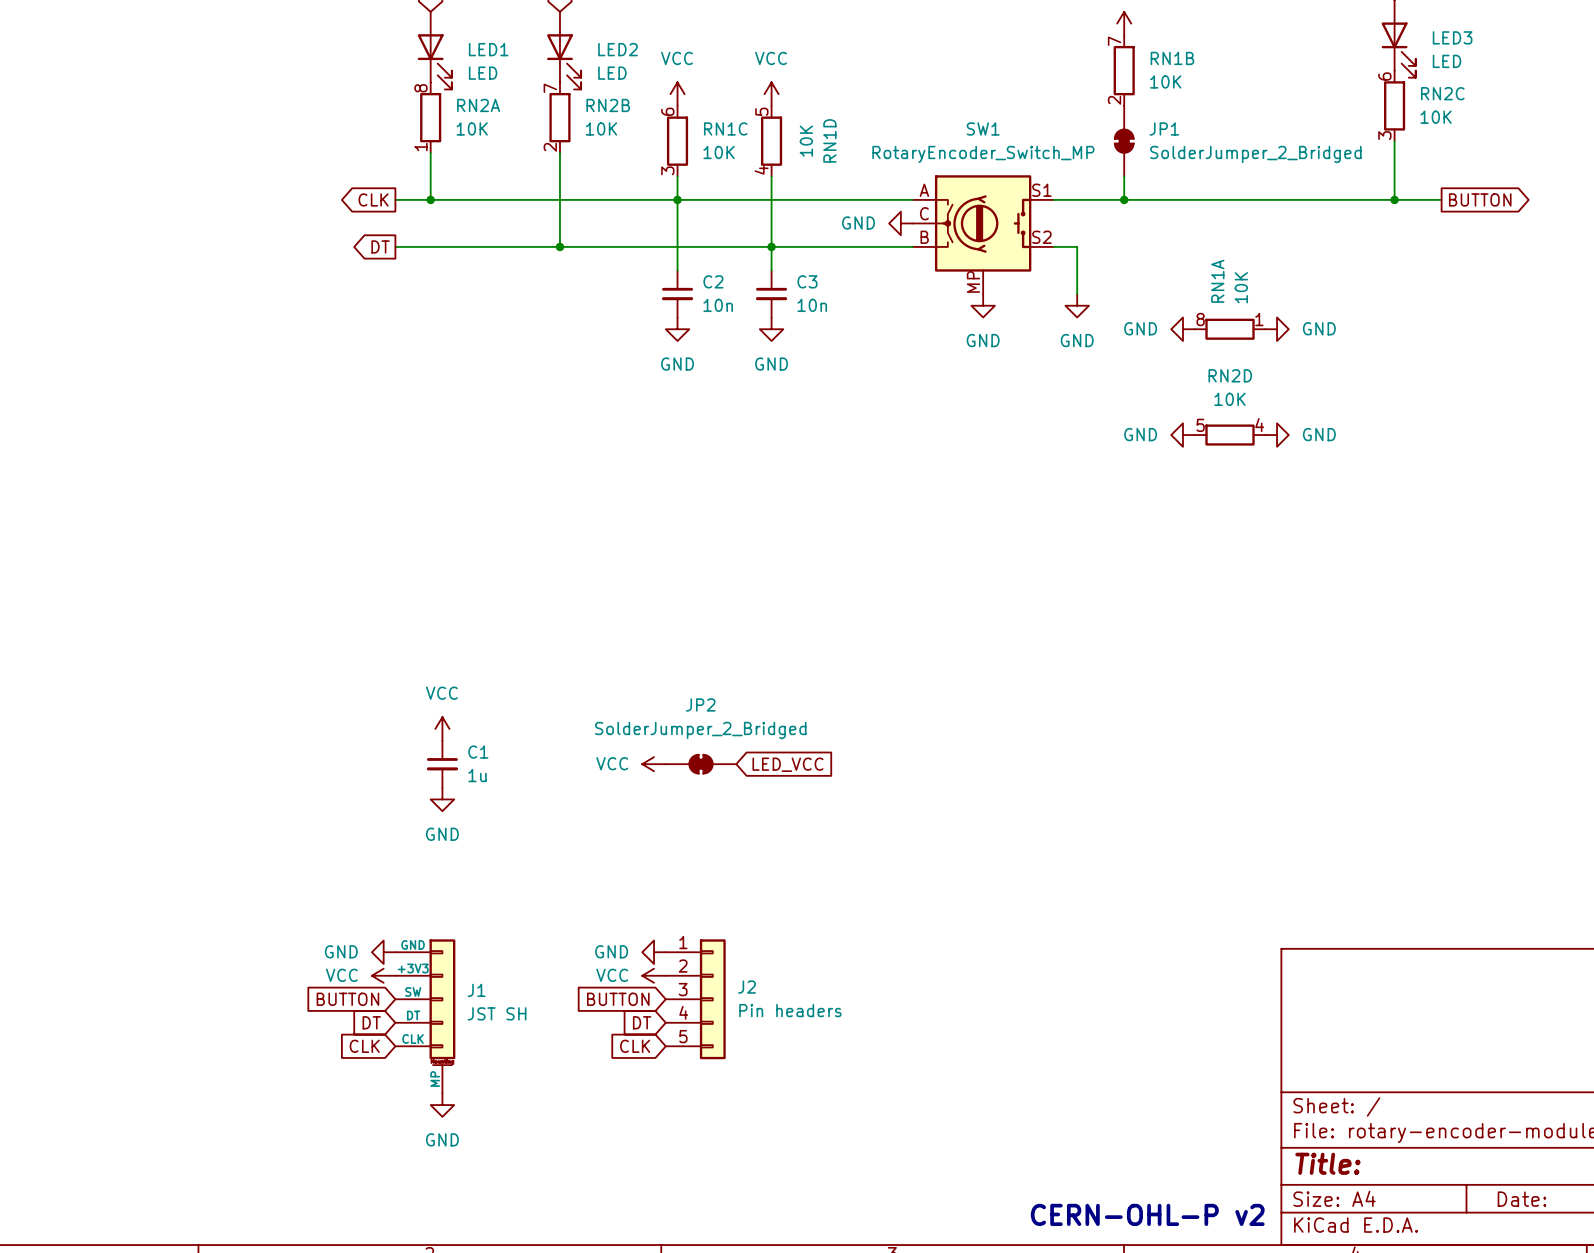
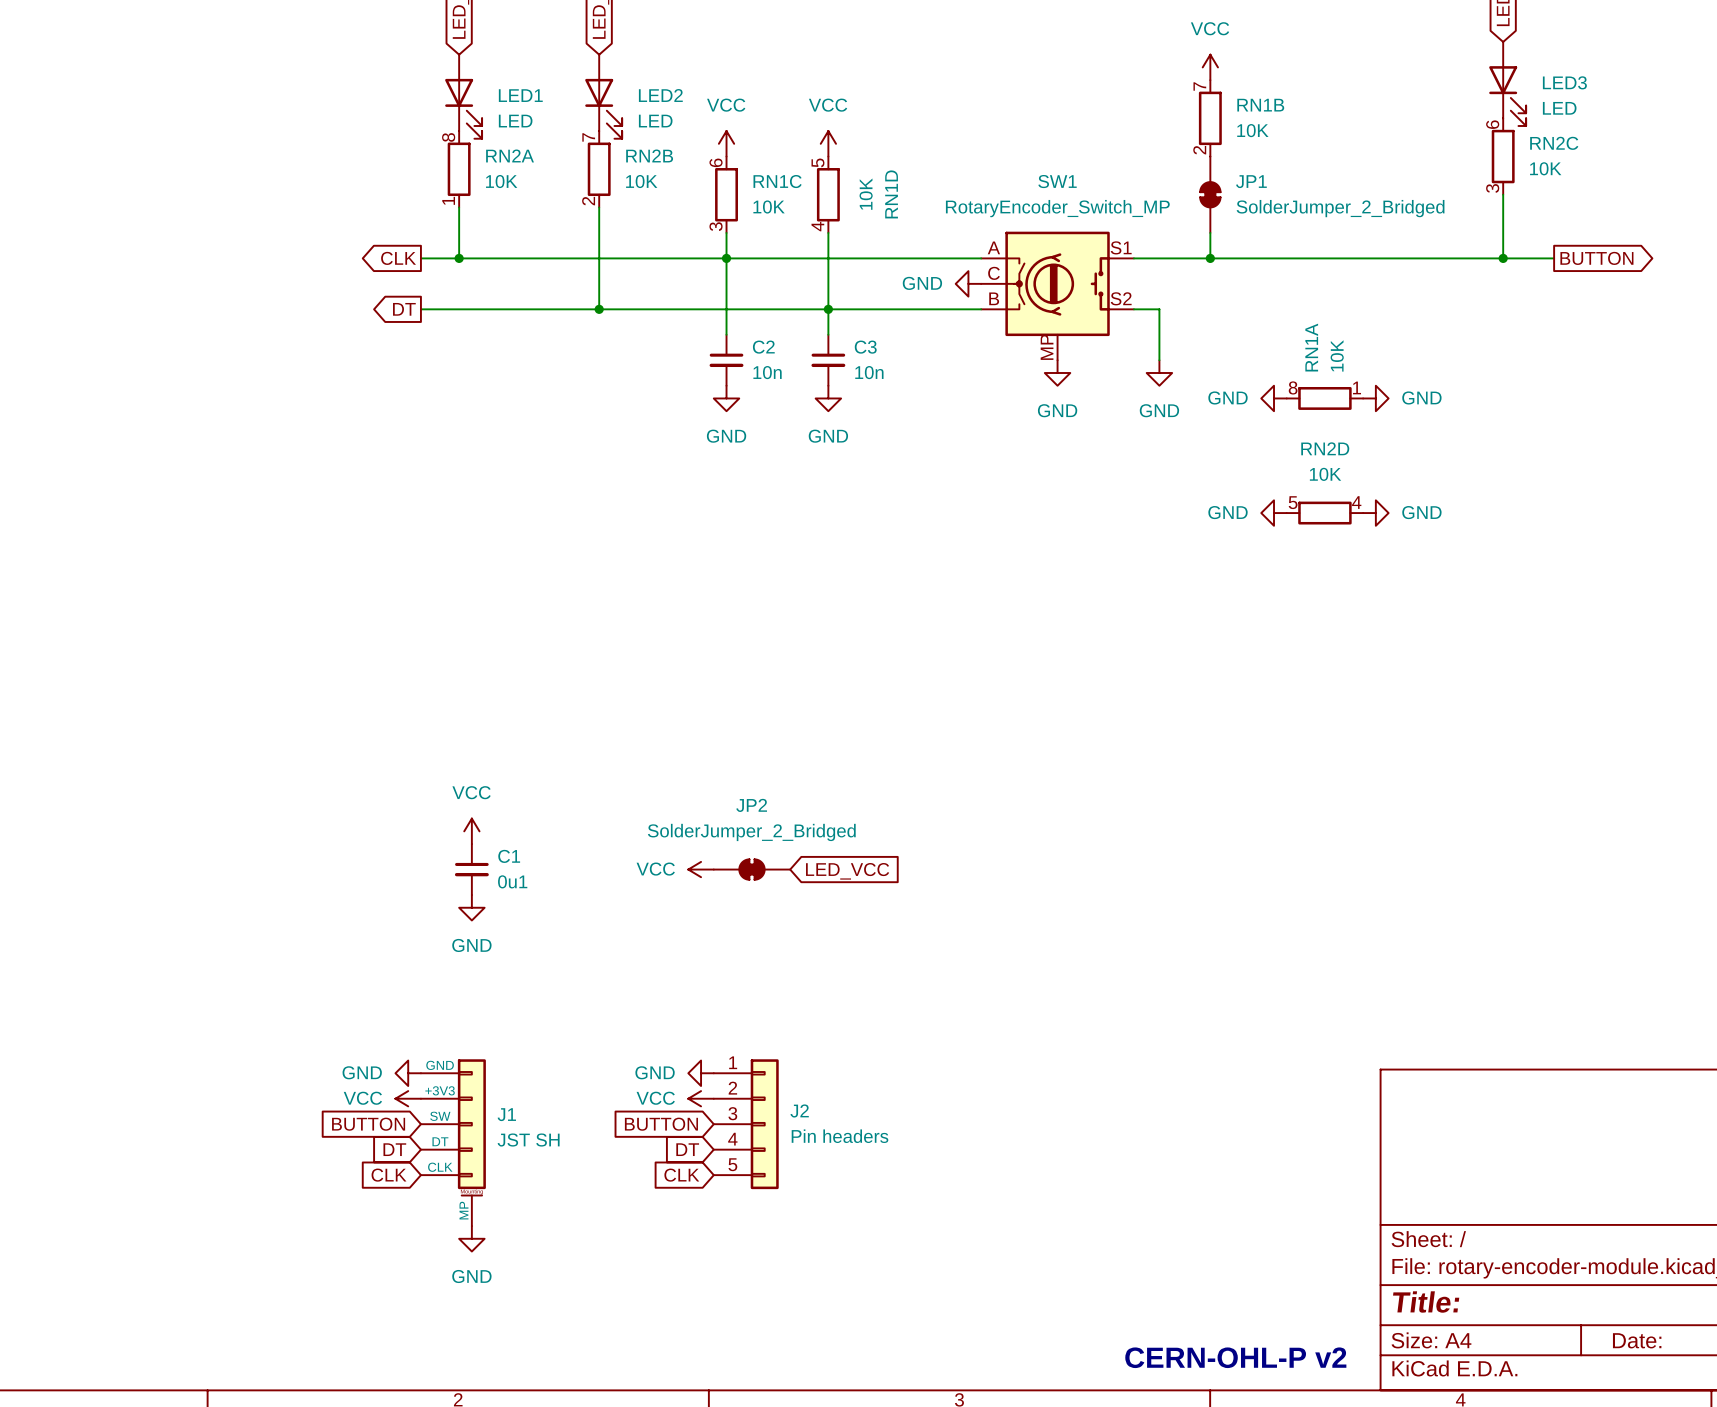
C1 value: 1u (477, 775) -> 0u1 (512, 881)

